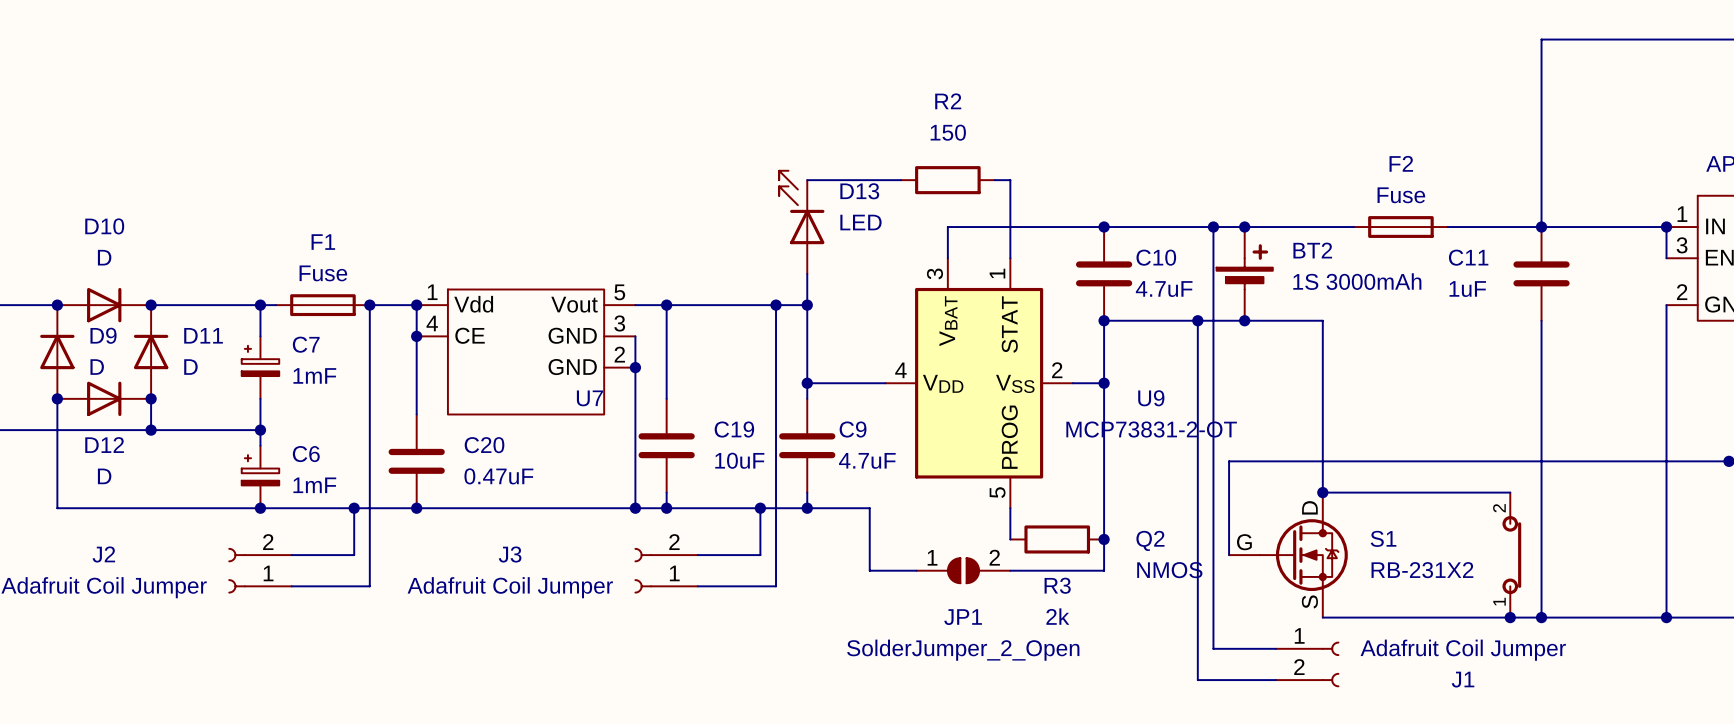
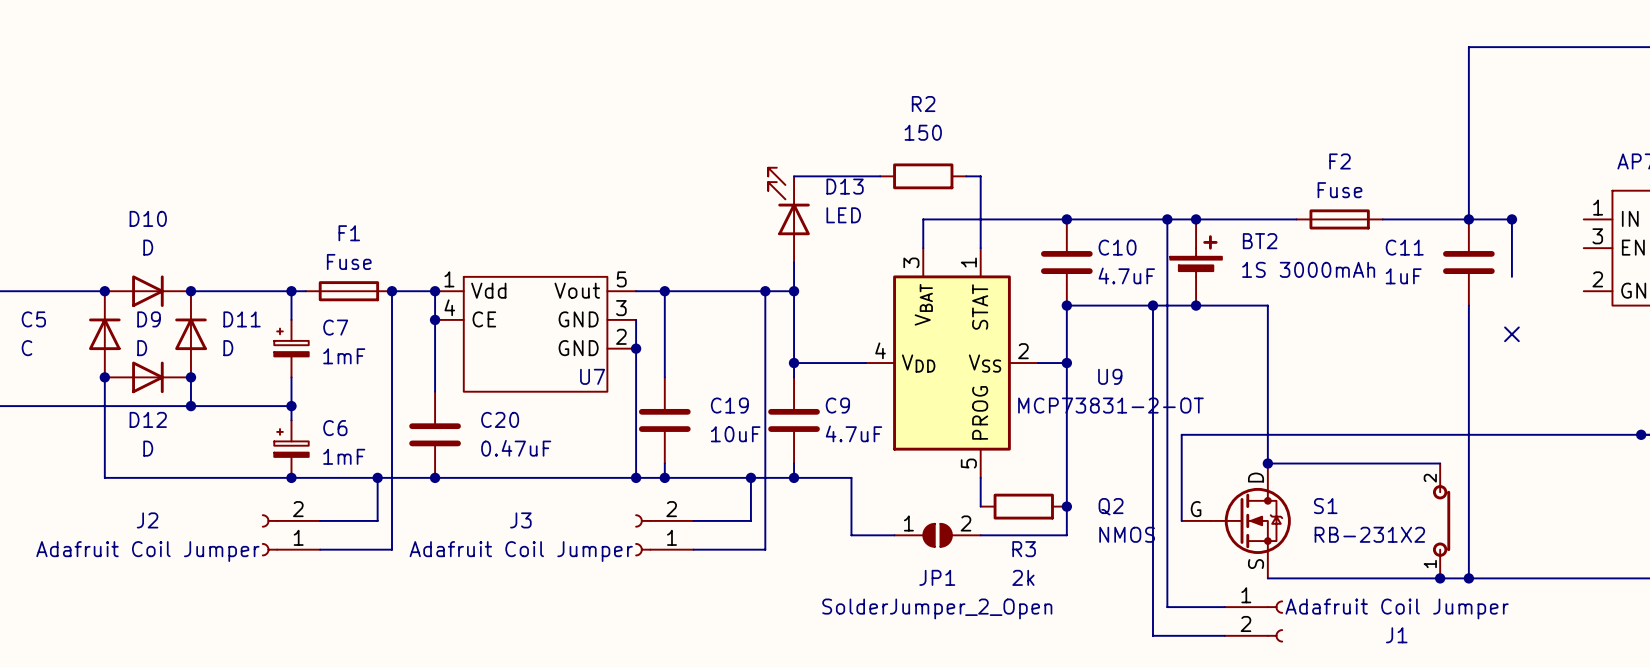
wire: (1588, 227) (1666, 227) (1666, 258) -> (1511, 219) (1511, 276)
junction: none -> (1511, 219)
junction: (1666, 227) -> none
wire: (1666, 305) (1666, 617) -> none
no-connect mark: none -> (1511, 334)
junction: (1666, 617) -> none

